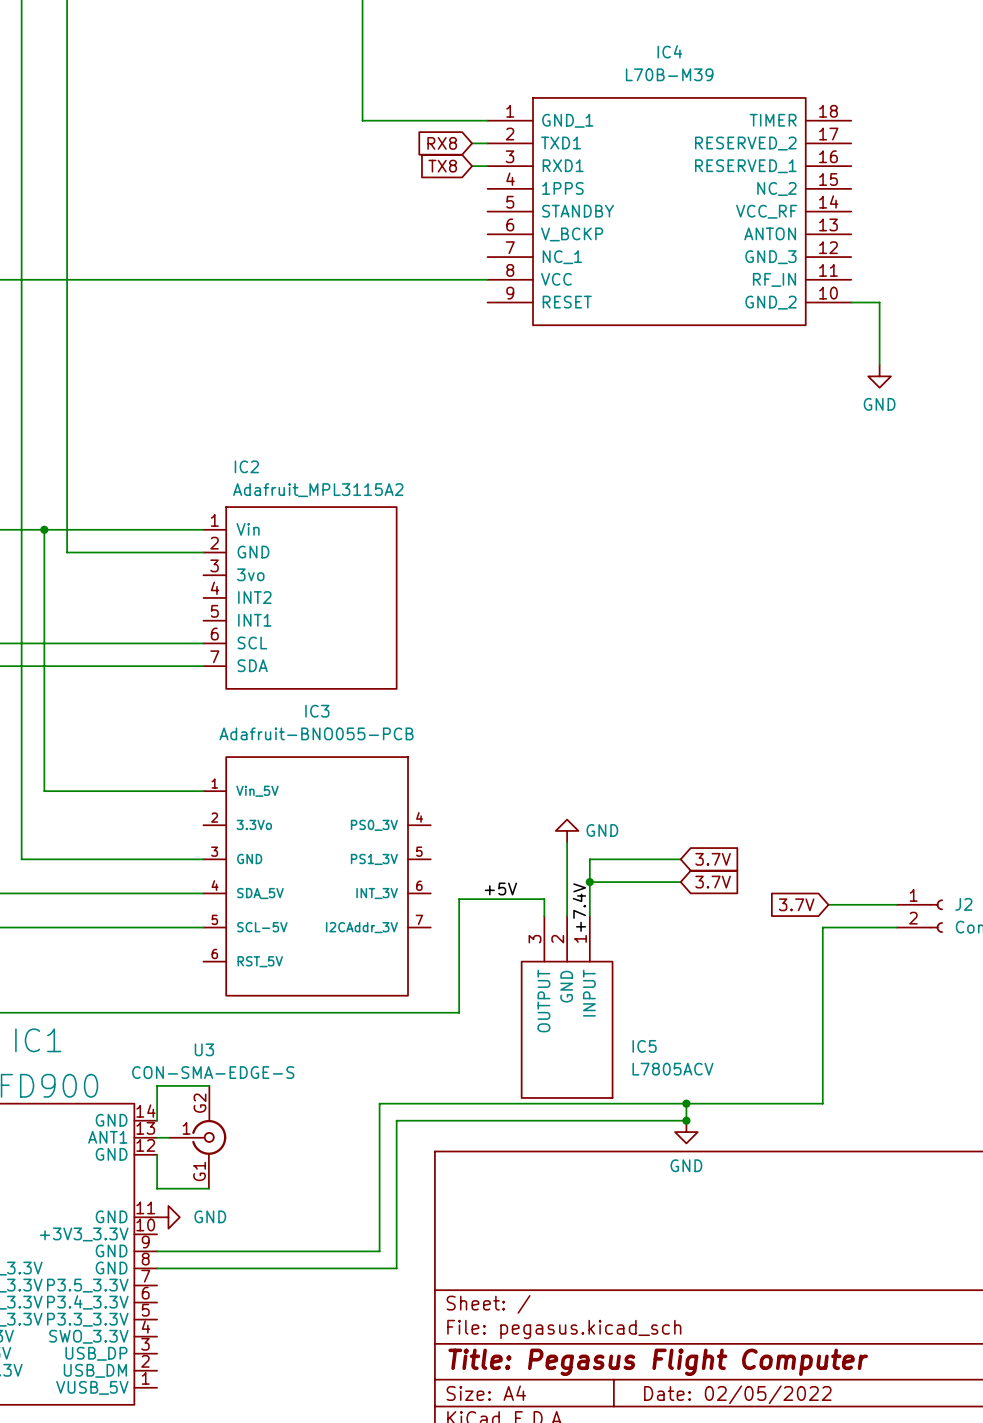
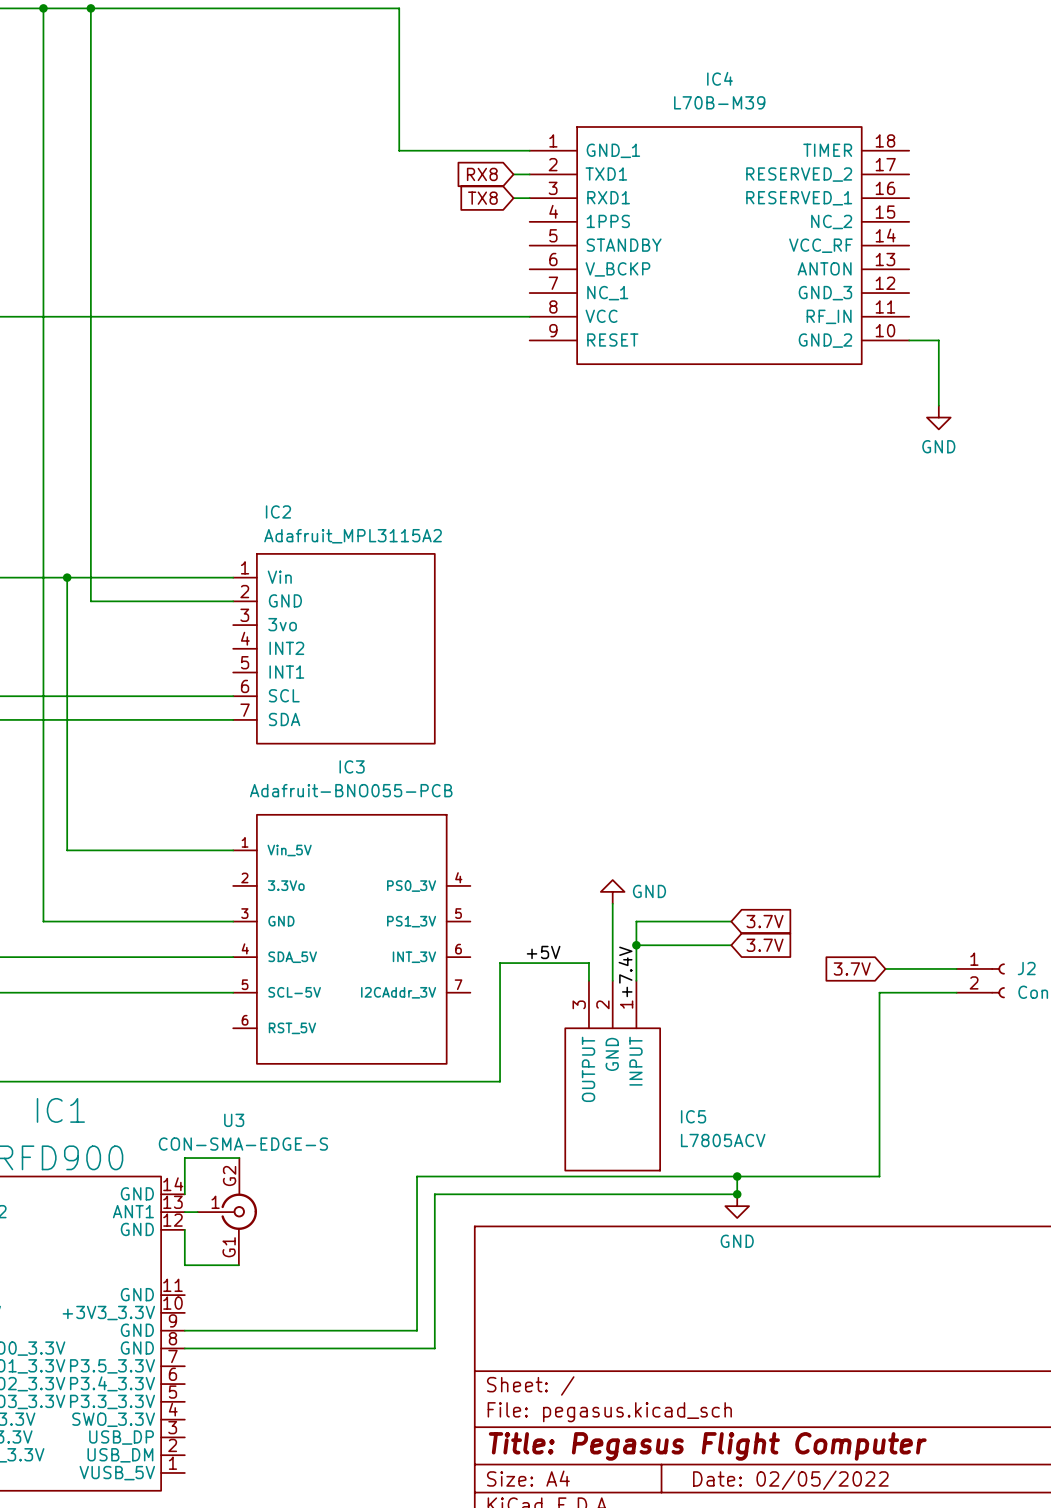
power symbol: GND (168, 1217) -> none

